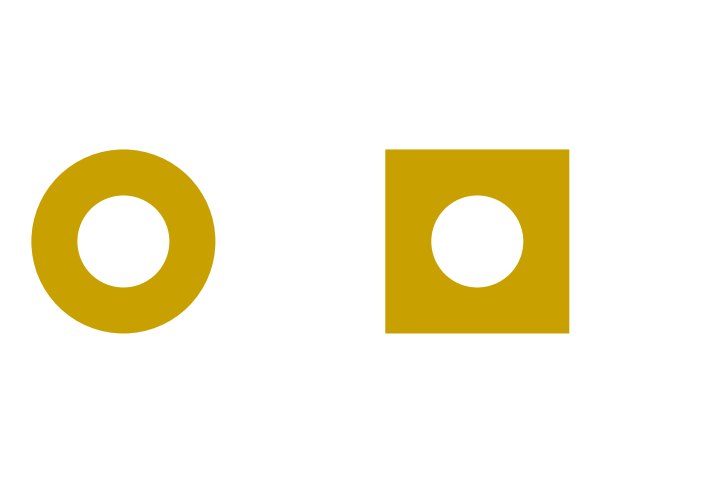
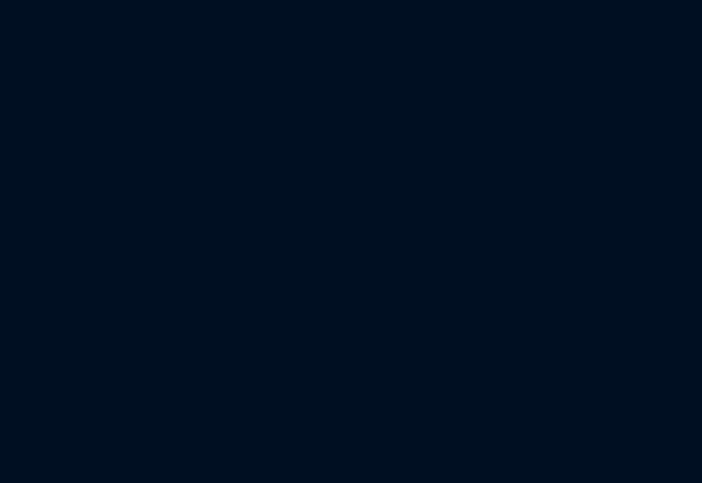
part: (300, 241) -> none

